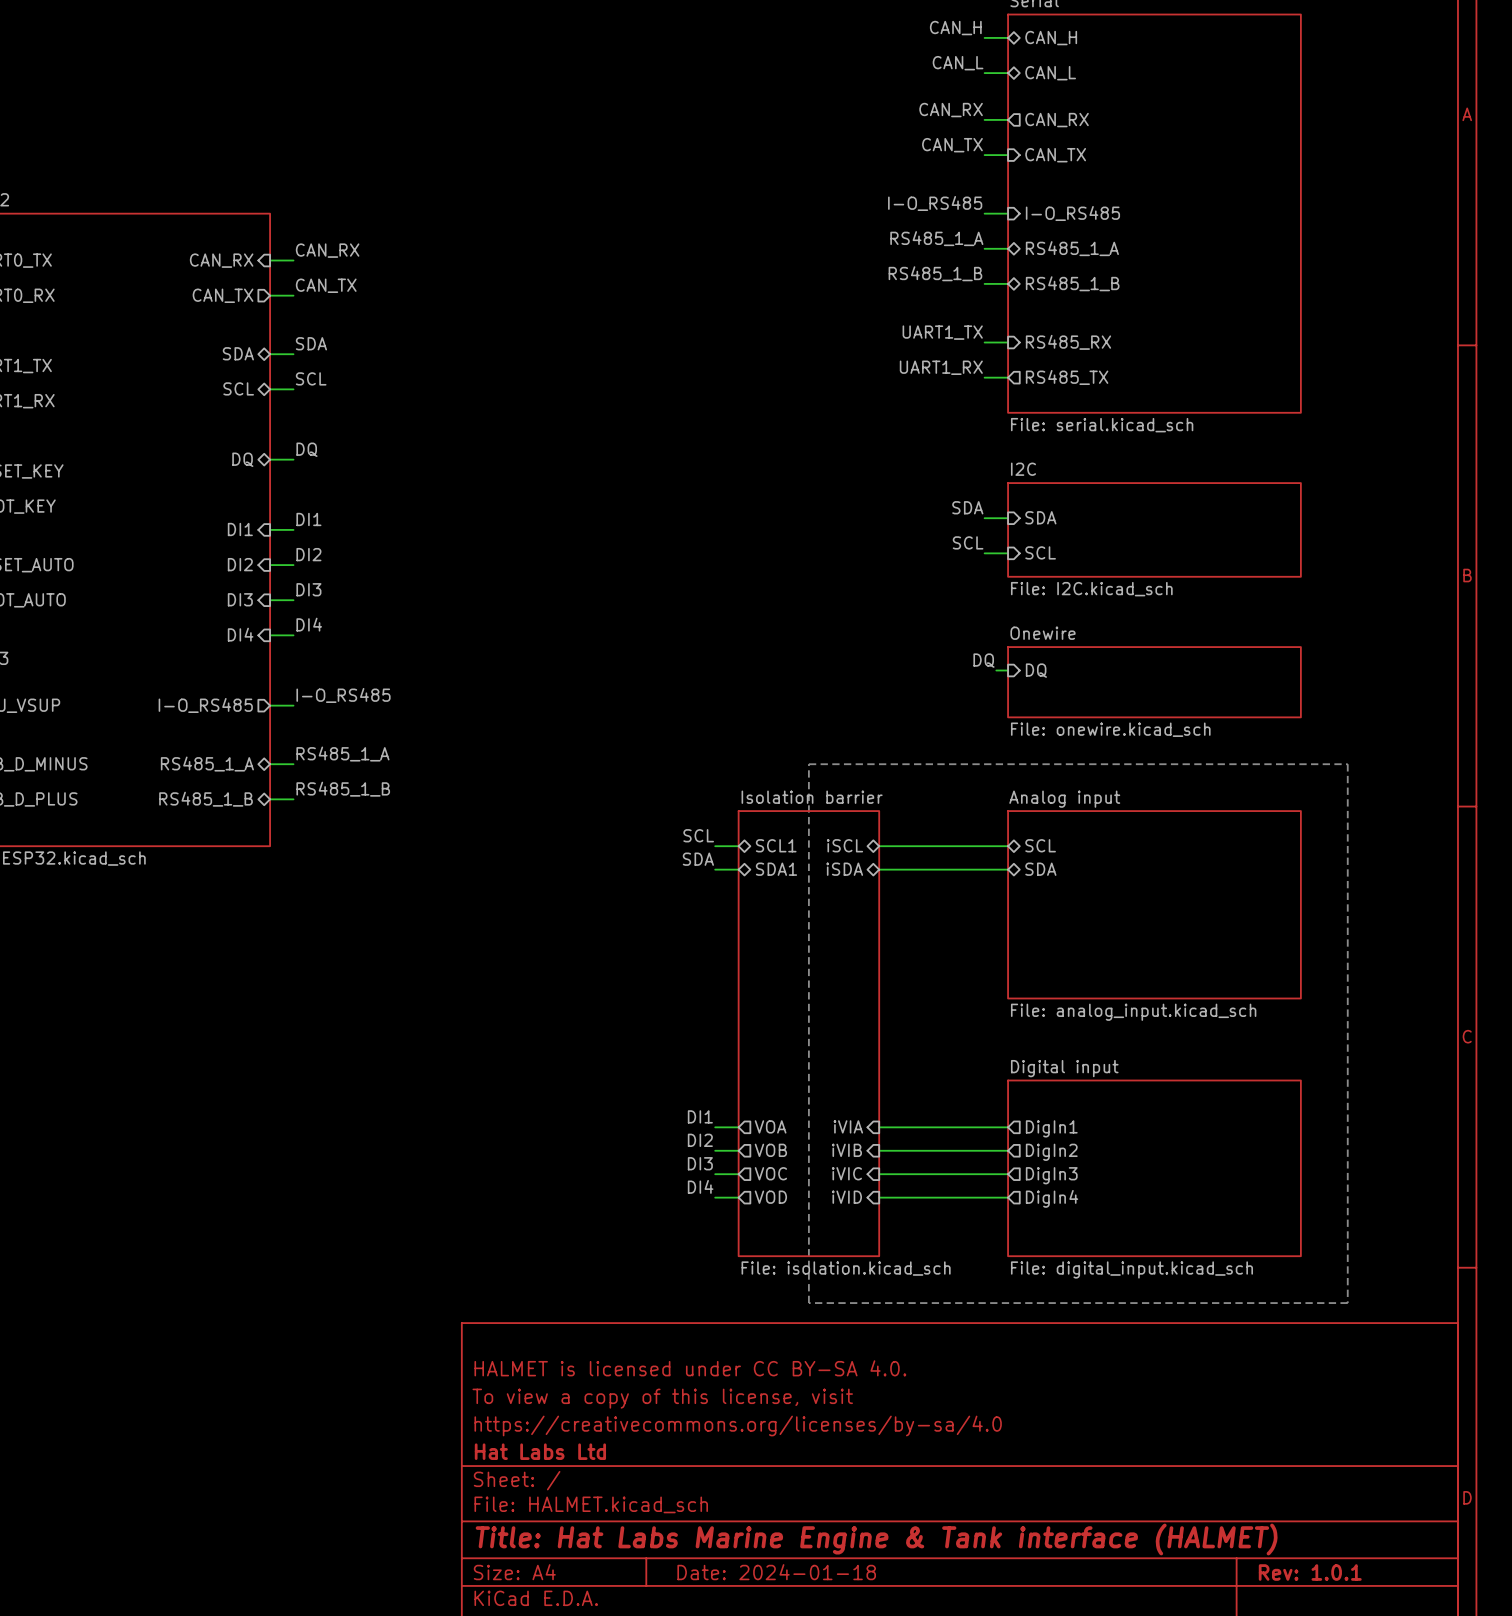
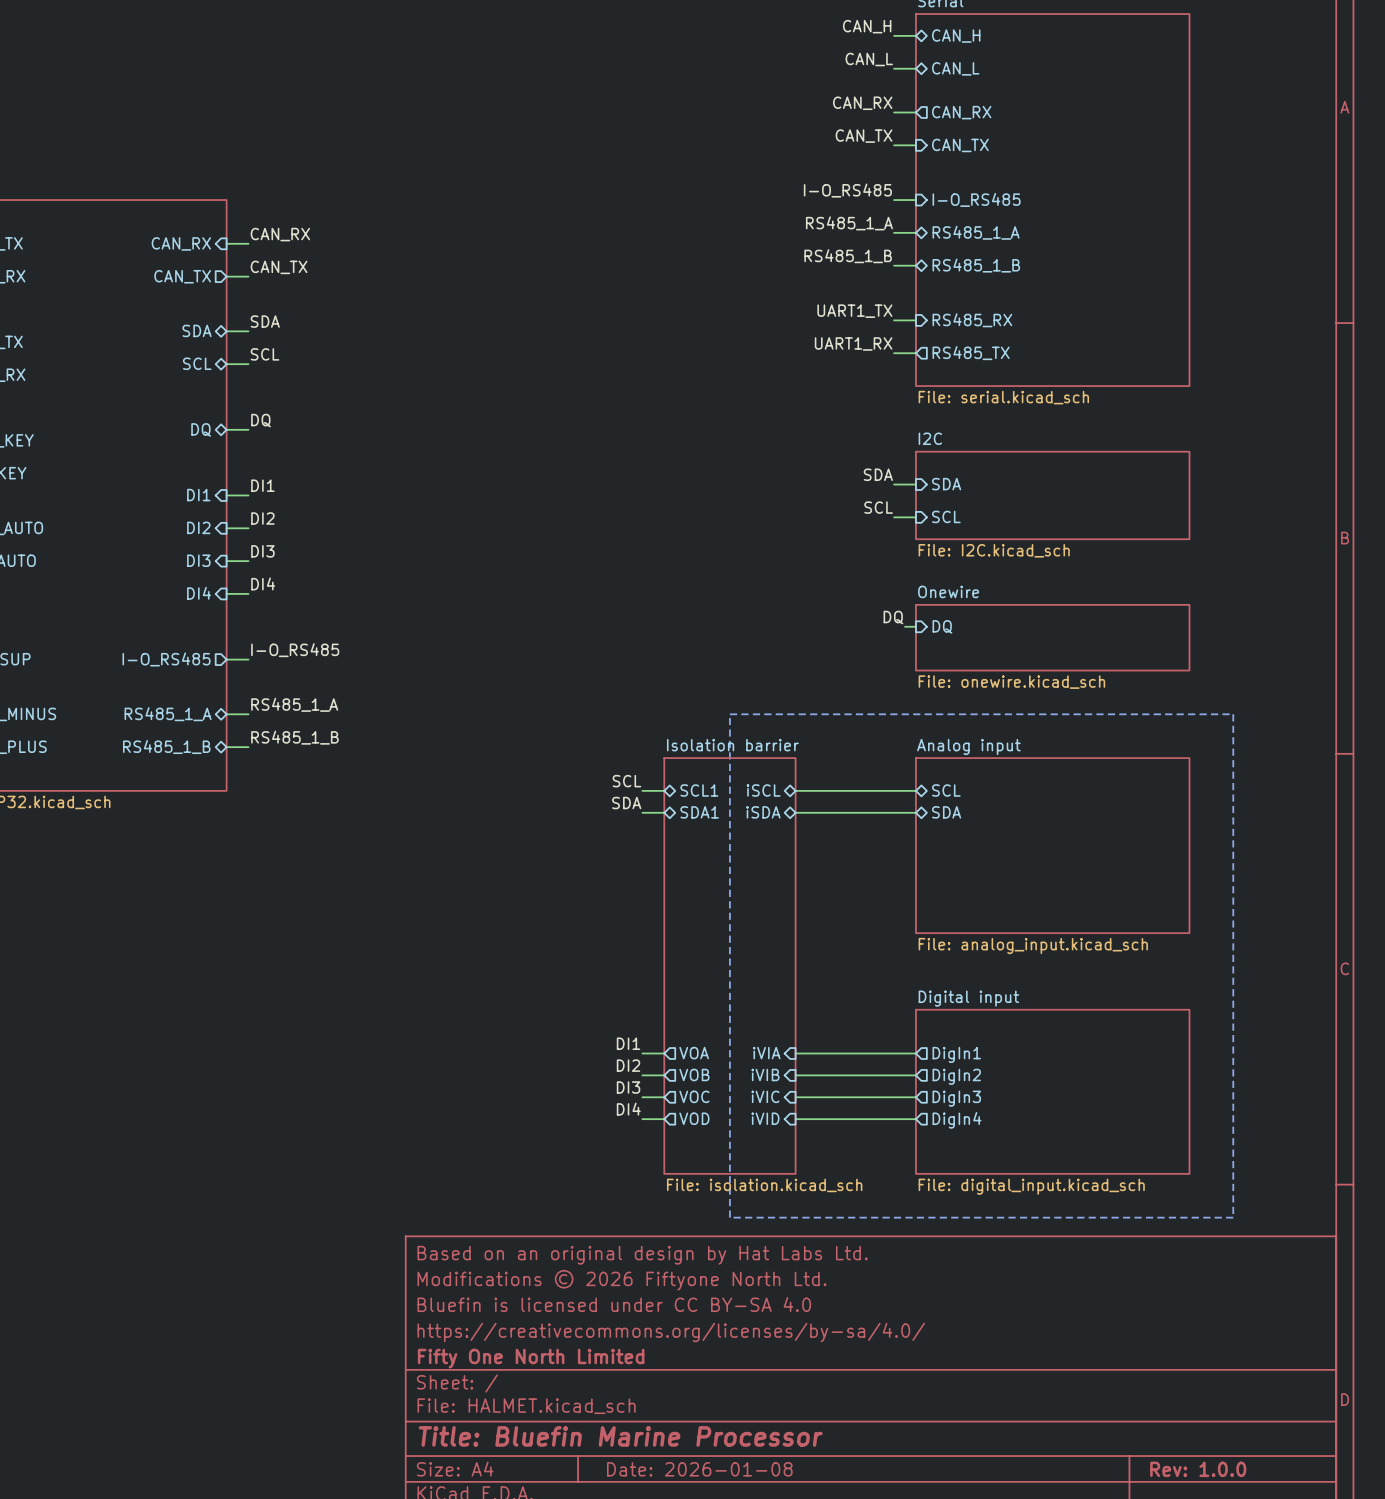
title block: none -> Based on an original design by Hat Labs Ltd. (642, 1255)
title block: HALMET is licensed under CC BY-SA 4.0. (690, 1368) -> Modifications © 2026 Fiftyone North Ltd. (621, 1280)
title block: To view a copy of this license, visit (662, 1398) -> Bluefin is licensed under CC BY-SA 4.0 (614, 1304)
title block: https://creativecommons.org/licenses/by-sa/4.0 (738, 1425) -> https://creativecommons.org/licenses/by-sa/4.0/ (671, 1332)
title block: Hat Labs Ltd (540, 1451) -> Fifty One North Limited (531, 1358)
title block: Title: Hat Labs Marine Engine & Tank interface (HALMET) (876, 1539) -> Title: Bluefin Marine Processor (620, 1436)
title block: Date: 2024-01-18 (776, 1572) -> Date: 2026-01-08 (699, 1469)
title block: Rev: 1.0.1 (1310, 1572) -> Rev: 1.0.0 (1198, 1469)

